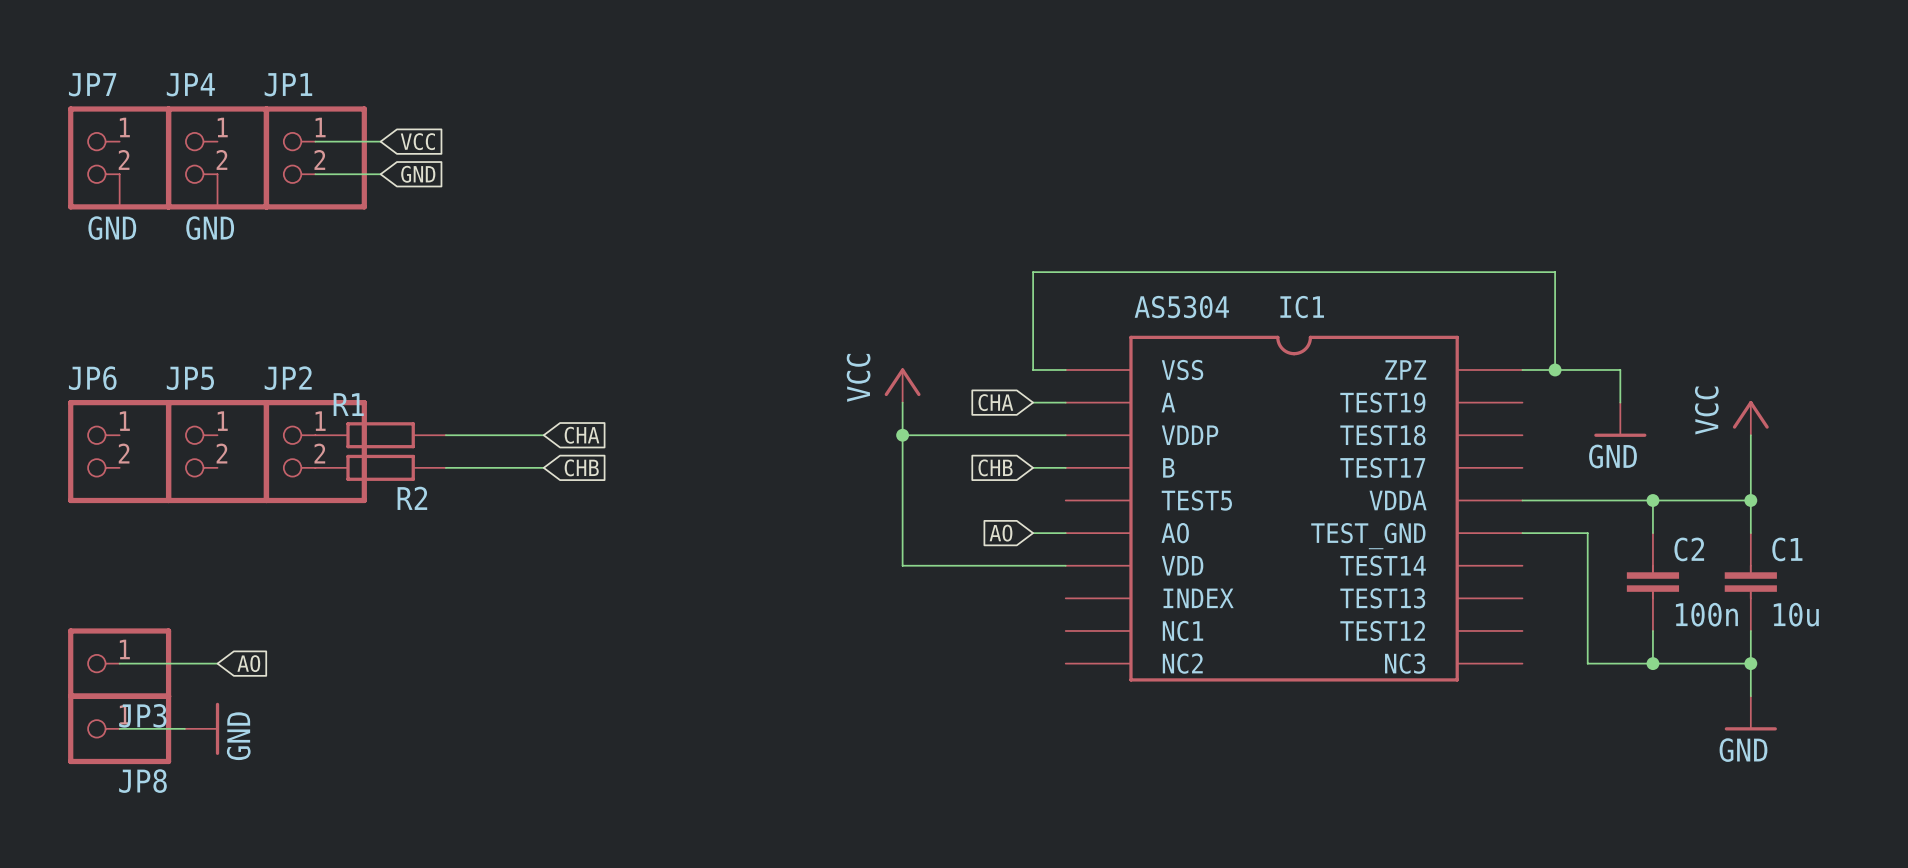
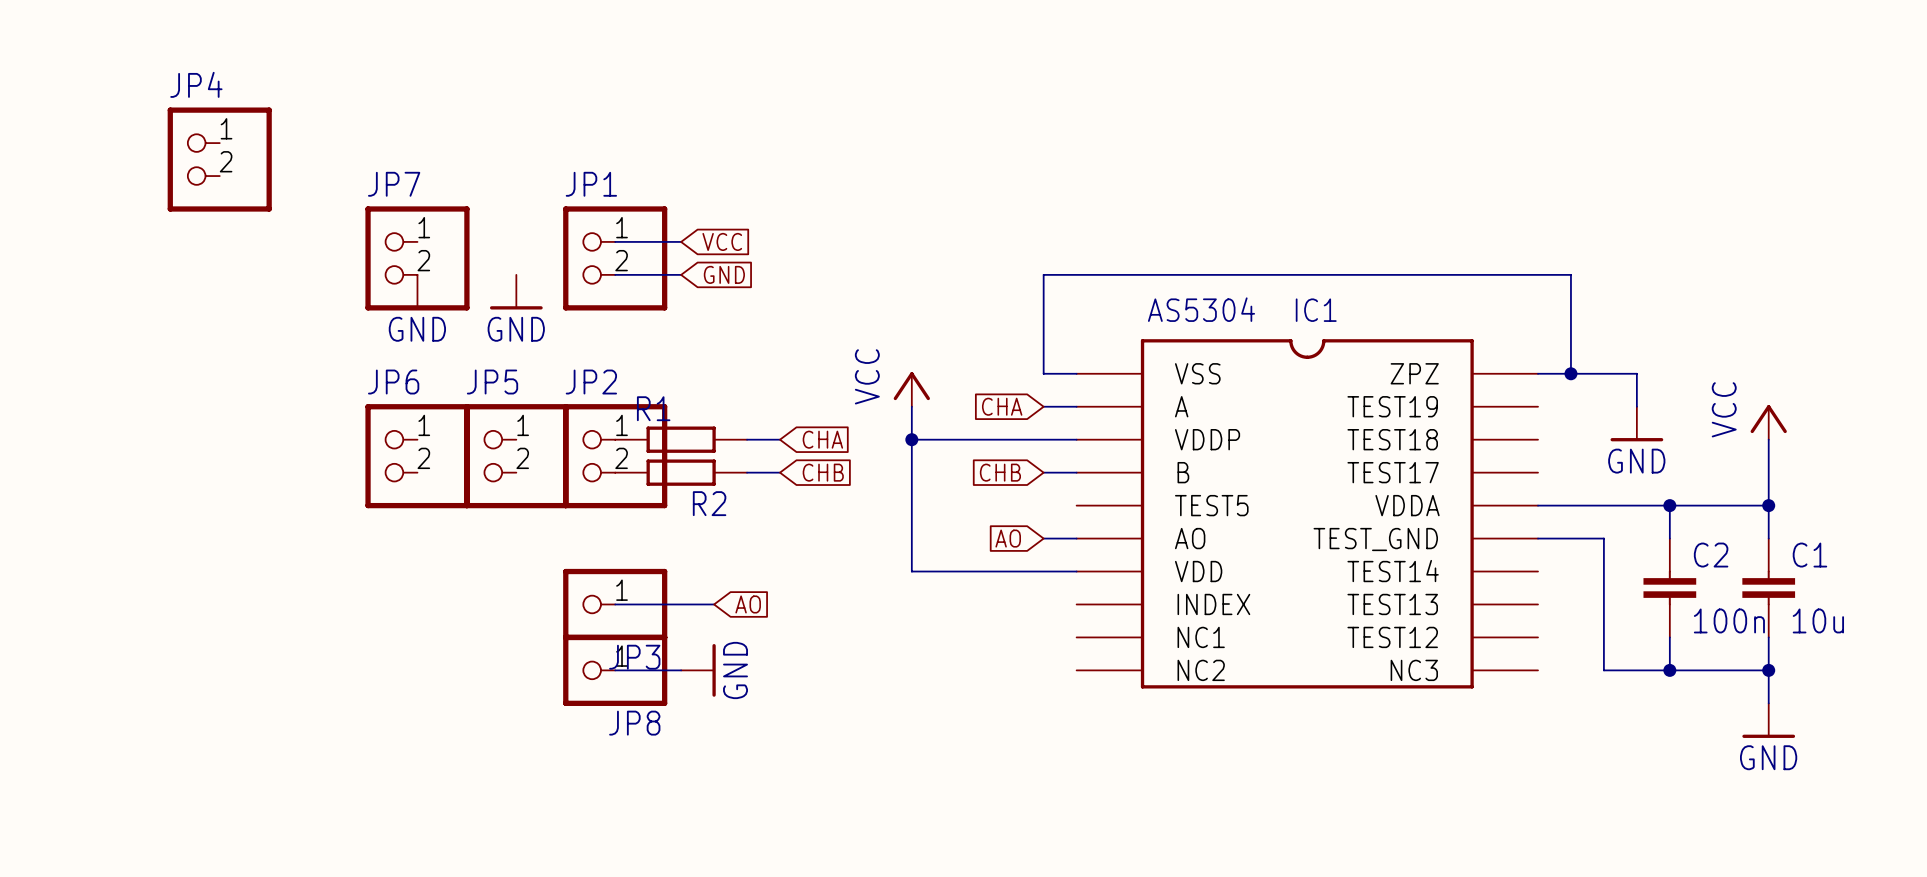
wire: (315, 141) (380, 141) -> (615, 241) (681, 241)
global label position: VCC (417, 141) -> VCC (722, 241)
JP7 position: (119, 157) -> (417, 258)
JP1 position: (315, 157) -> (615, 258)
wire: (315, 174) (380, 174) -> (615, 274) (681, 274)
global label position: GND (418, 174) -> GND (724, 274)
power symbol: GND (119, 191) -> none
power symbol: GND (217, 191) -> none
power symbol: none -> GND (417, 292)
power symbol: none -> GND (516, 292)
R1 position: (380, 435) -> (681, 439)
wire: (445, 435) (543, 435) -> none
global label position: CHA (582, 435) -> CHA (822, 439)
wire: none -> (747, 439) (780, 439)
JP6 position: (119, 451) -> (417, 456)
JP5 position: (217, 451) -> (516, 456)
JP2 position: (315, 451) -> (615, 456)
R2 position: (380, 467) -> (681, 472)
wire: (445, 467) (543, 467) -> (615, 604) (714, 604)
global label position: CHB (581, 467) -> CHB (823, 472)
wire: none -> (747, 472) (780, 472)
global label: none -> AO (748, 604)
wire: (119, 663) (217, 663) -> none
JP3 position: (119, 663) -> (615, 604)
global label: AO (248, 663) -> none
wire: none -> (615, 670) (681, 670)
power symbol: none -> GND (698, 670)
wire: (119, 728) (184, 728) -> none
JP8 position: (119, 728) -> (615, 670)
power symbol: GND (202, 728) -> none

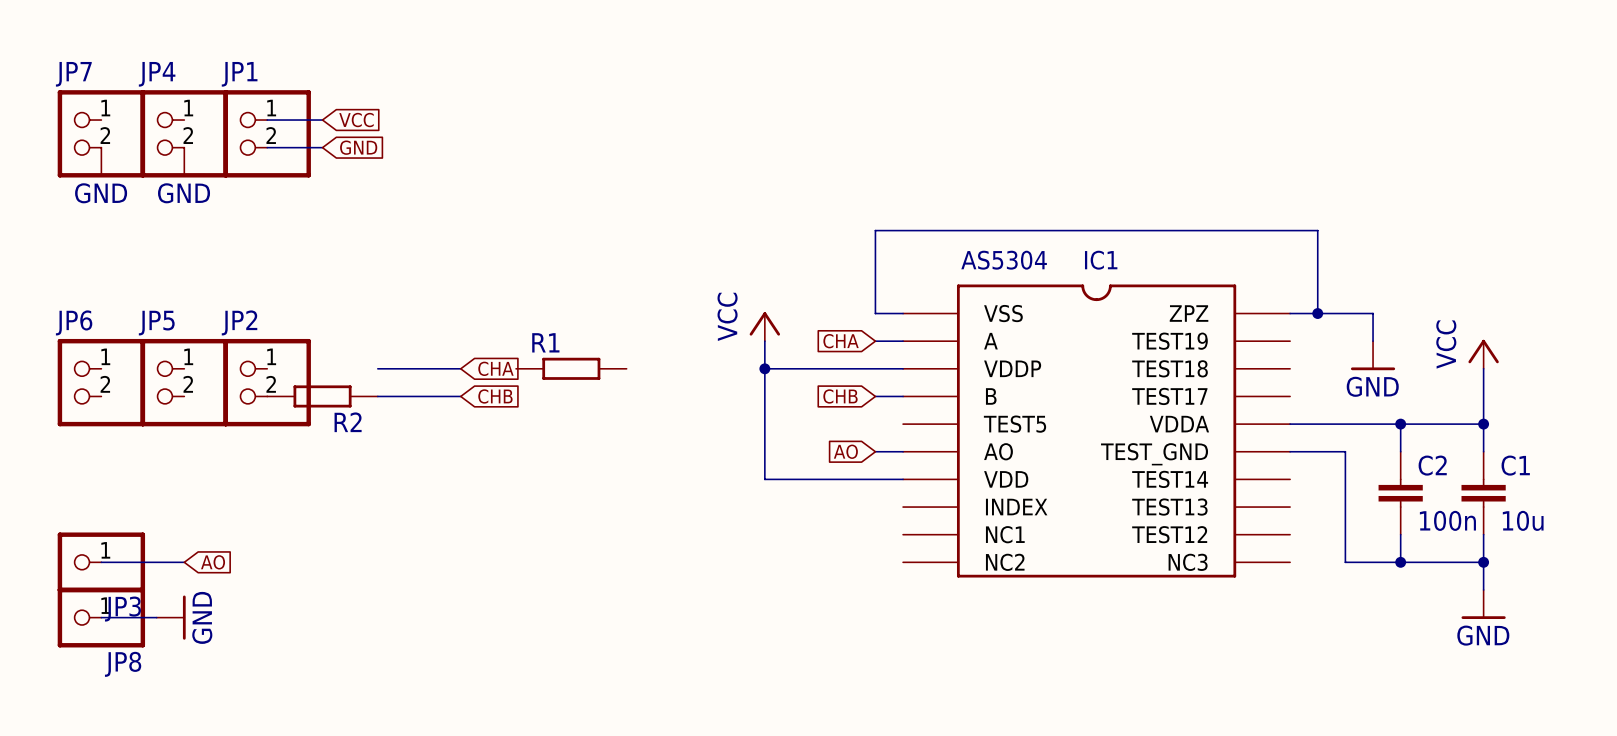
power symbol: none -> GND (101, 162)
power symbol: none -> GND (184, 162)
wire: (615, 241) (681, 241) -> (267, 120) (322, 120)
global label position: VCC (722, 241) -> VCC (356, 120)
JP7 position: (417, 258) -> (101, 133)
JP1 position: (615, 258) -> (267, 133)
wire: (615, 274) (681, 274) -> (267, 147) (322, 147)
global label position: GND (724, 274) -> GND (358, 147)
power symbol: GND (417, 292) -> none
power symbol: GND (516, 292) -> none
wire: none -> (377, 368) (460, 368)
wire: (747, 439) (780, 439) -> none
global label position: CHA (822, 439) -> CHA (495, 368)
JP6 position: (417, 456) -> (101, 382)
JP5 position: (516, 456) -> (184, 382)
JP2 position: (615, 456) -> (267, 382)
R2 position: (681, 472) -> (322, 396)
wire: (747, 472) (780, 472) -> none
global label position: CHB (823, 472) -> CHB (495, 396)
wire: (615, 604) (714, 604) -> (377, 396) (460, 396)
JP3 position: (615, 604) -> (101, 562)
global label: AO (748, 604) -> none
wire: none -> (101, 562) (184, 562)
global label: none -> AO (213, 562)
wire: (615, 670) (681, 670) -> none
JP8 position: (615, 670) -> (101, 617)
power symbol: GND (698, 670) -> none
wire: none -> (101, 617) (156, 617)
power symbol: none -> GND (171, 617)

